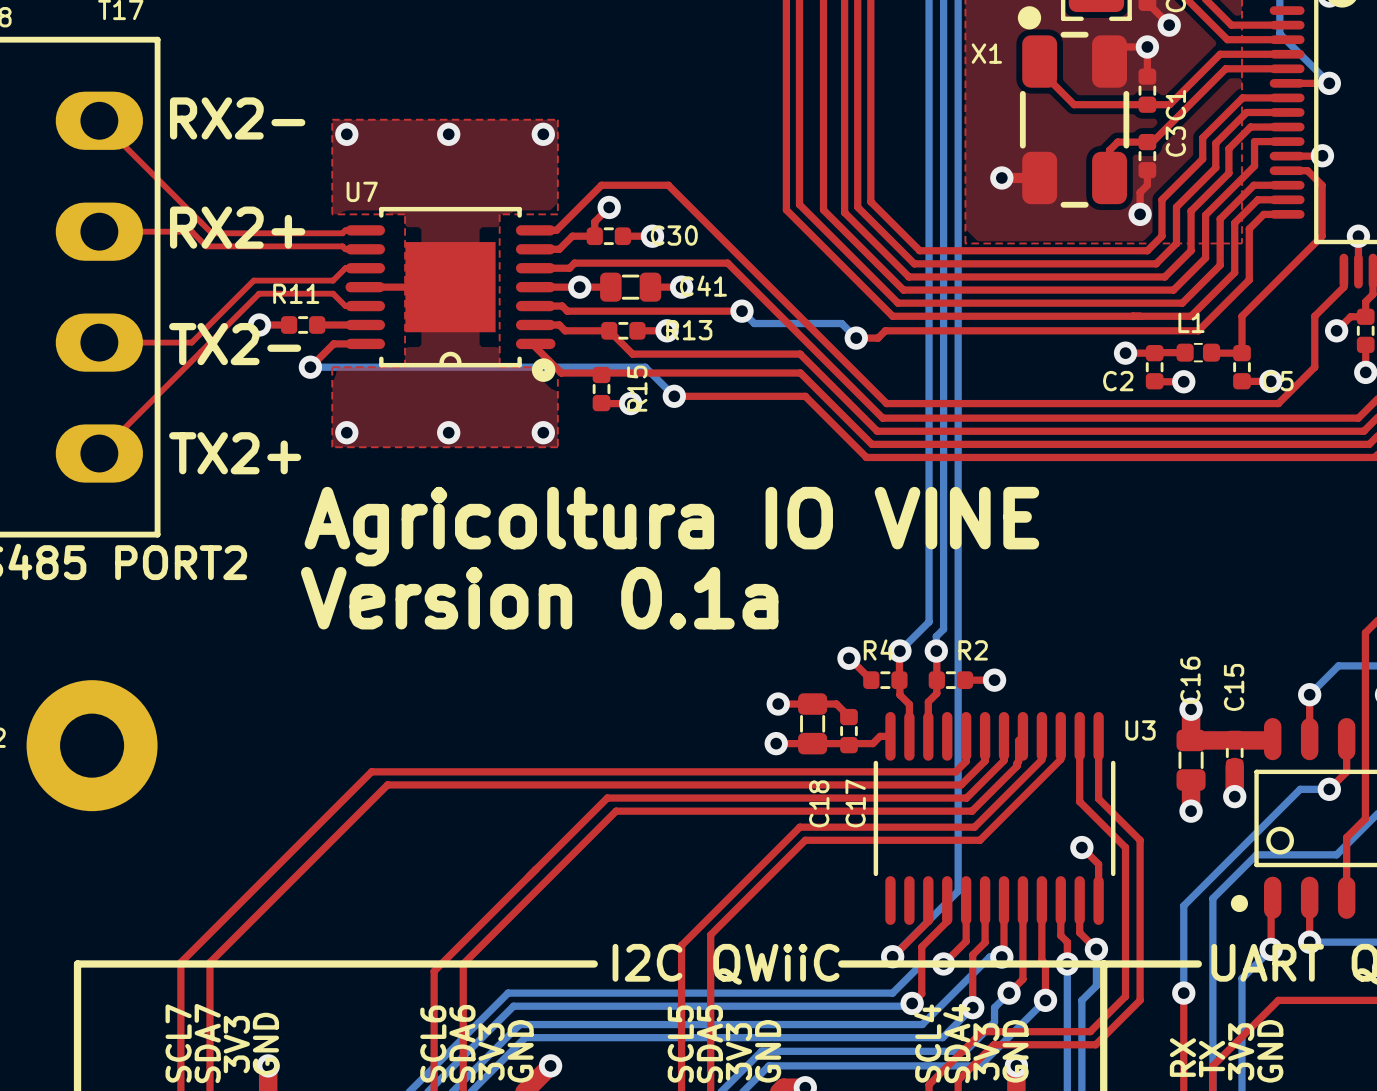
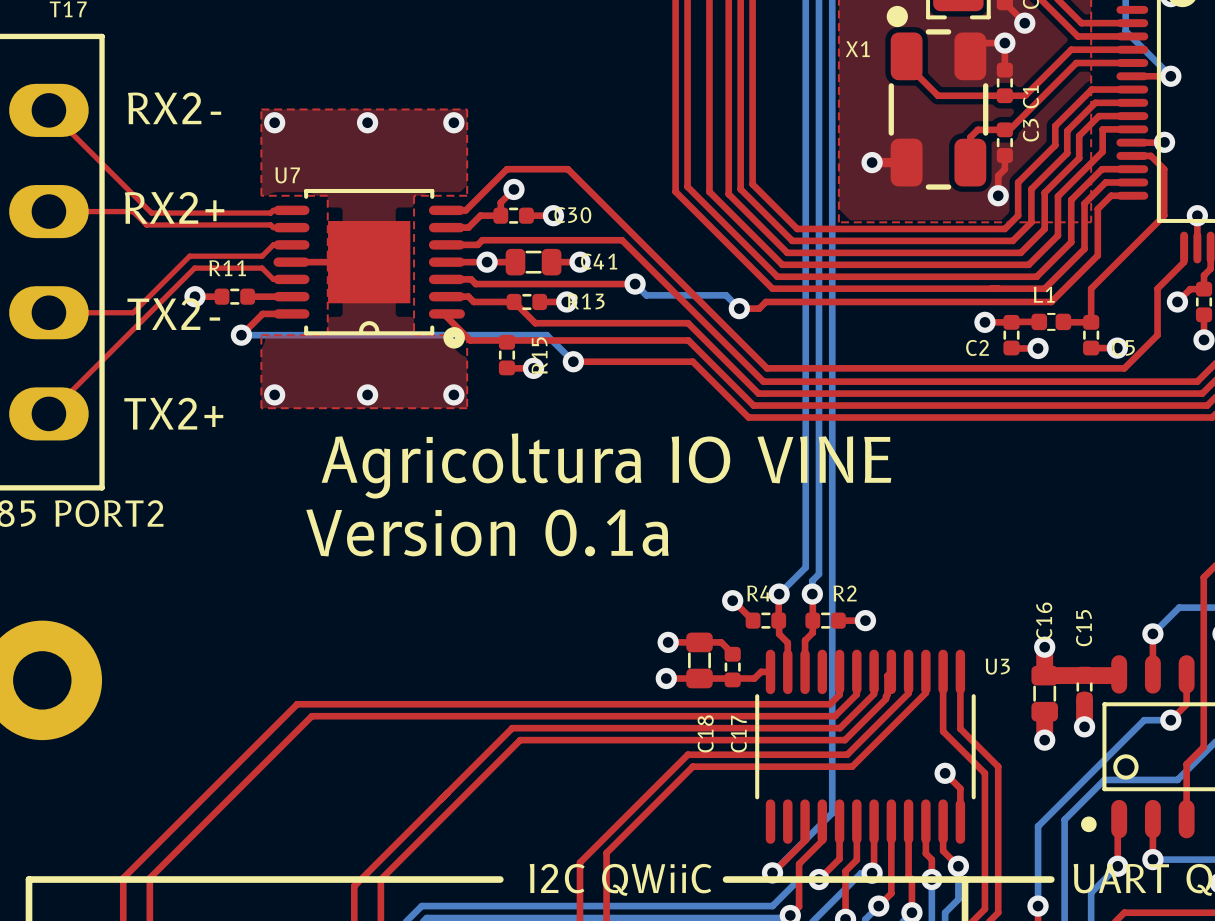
text position: Agricoltura IO VINE (671, 526) -> Agricoltura IO VINE (606, 465)
text position: Version 0.1a (539, 598) -> Version 0.1a (487, 532)

